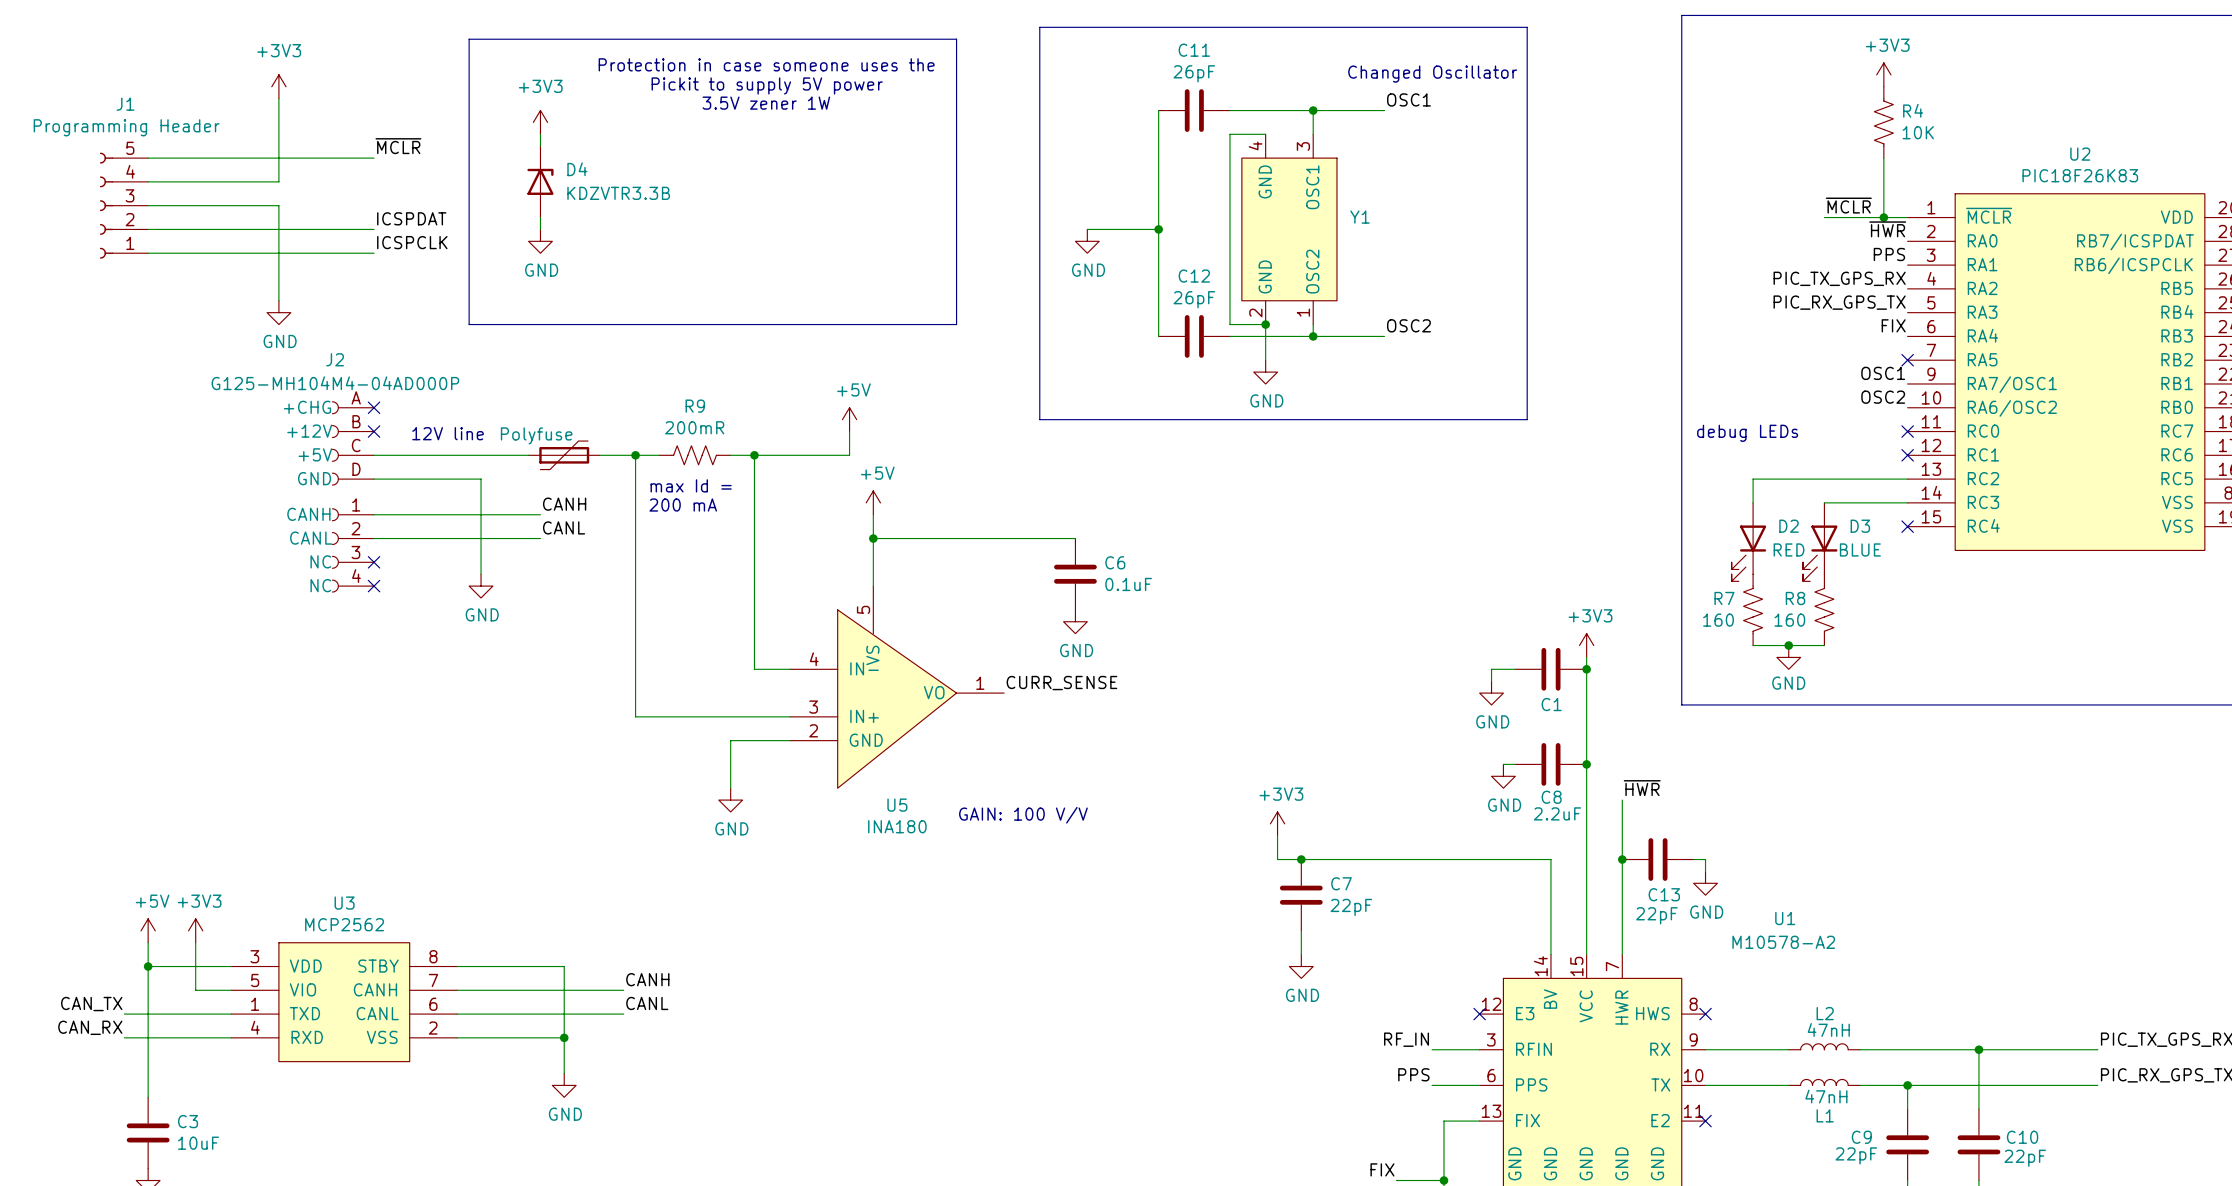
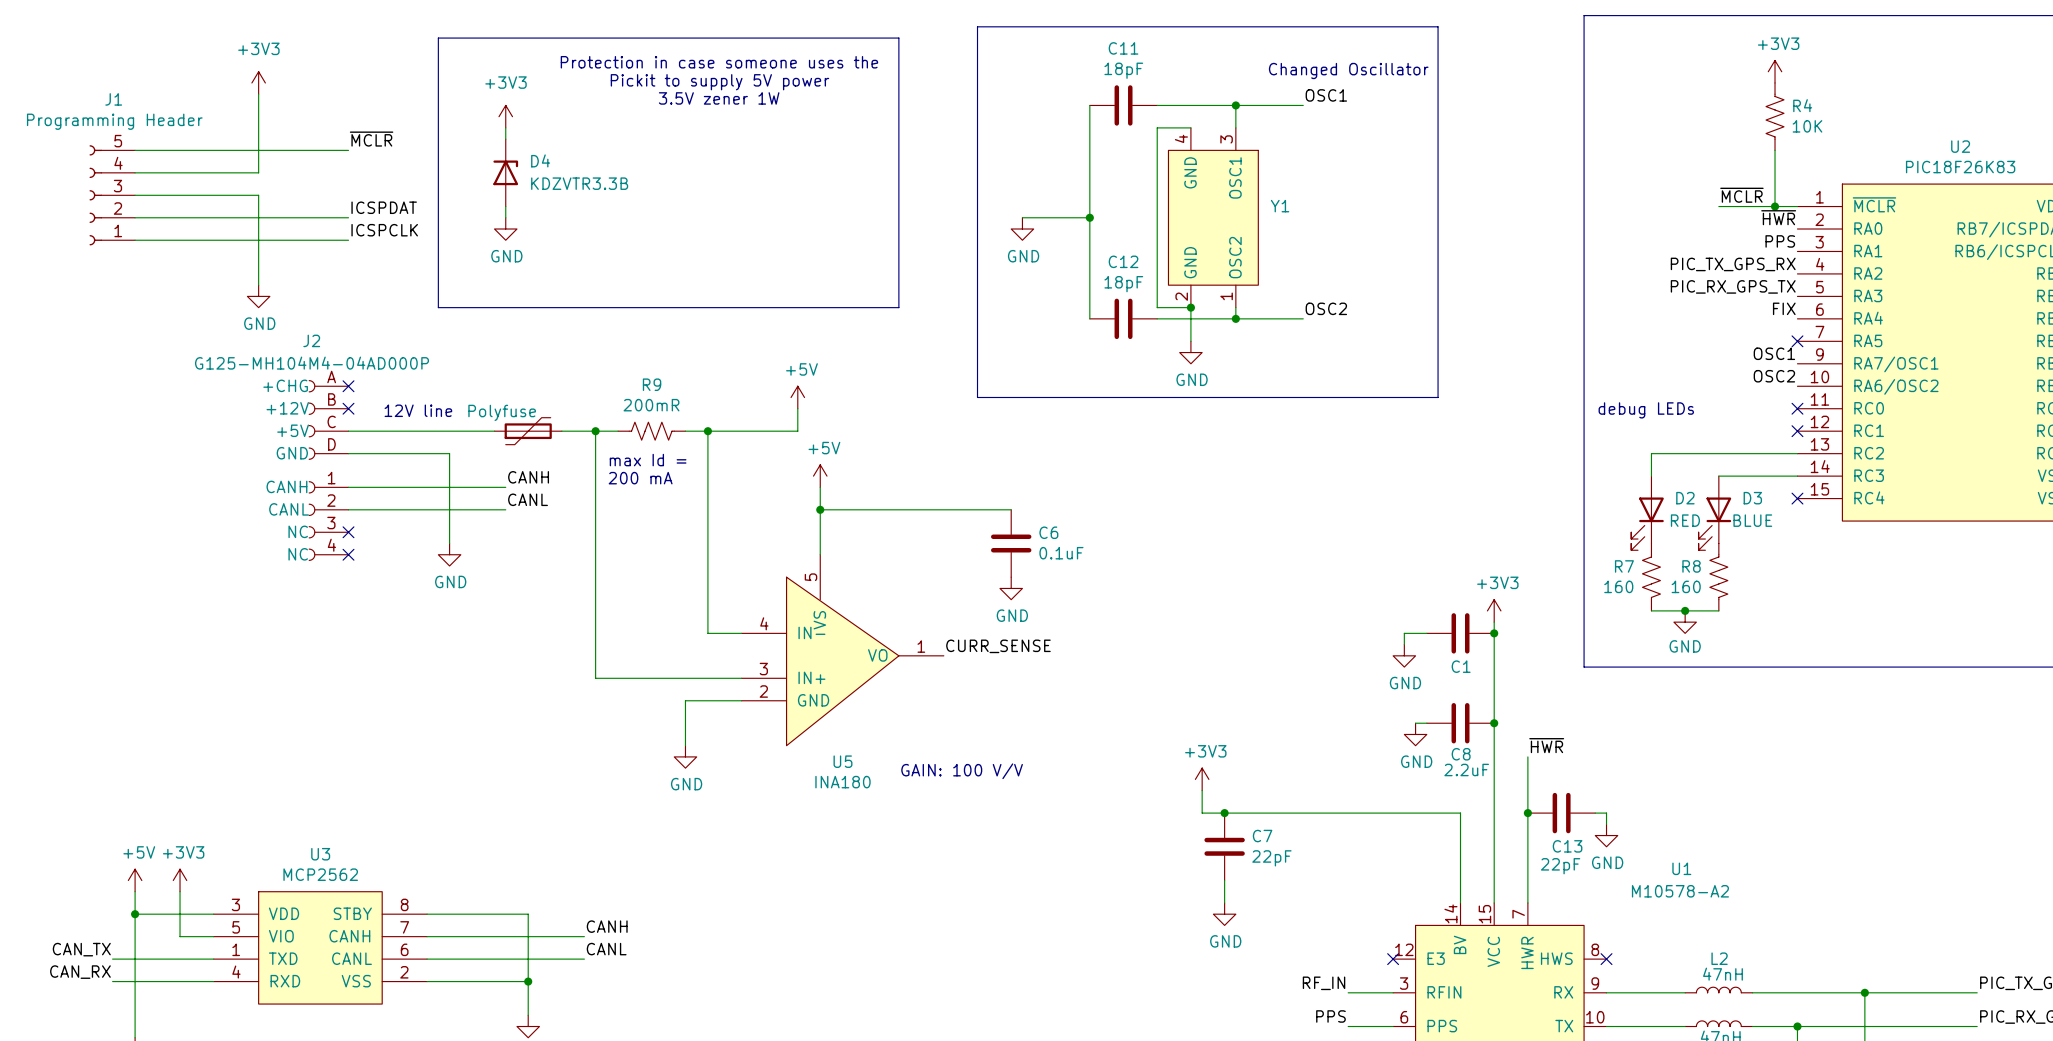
C11 value: 26pF (1194, 73) -> 18pF (1123, 70)
C12 value: 26pF (1194, 299) -> 18pF (1123, 284)

